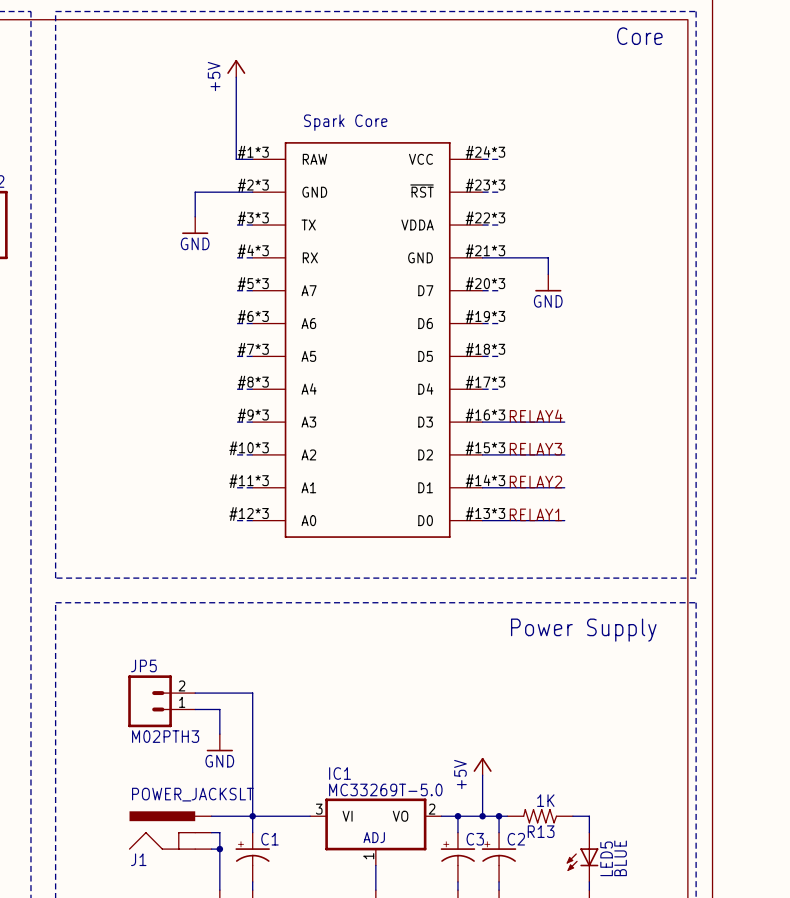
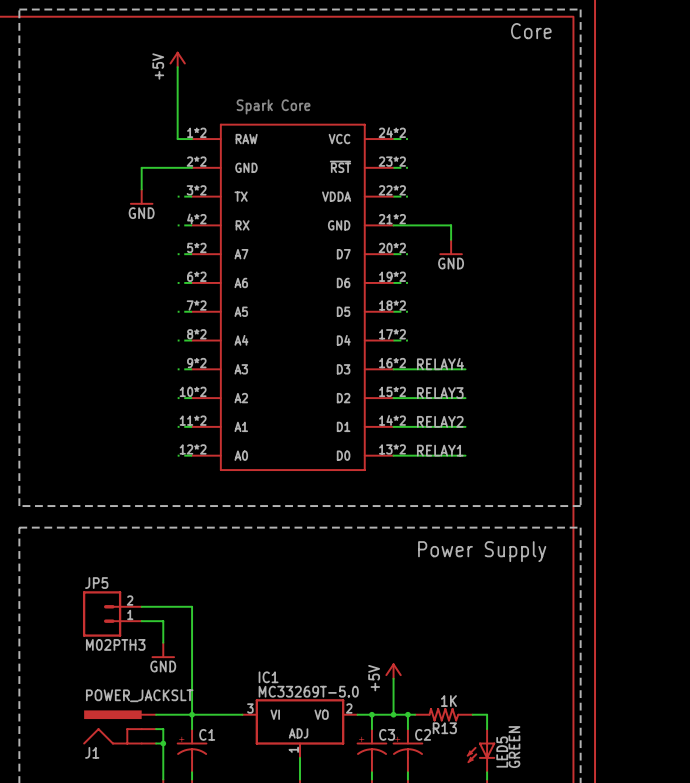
part symbol: [252, 142, 483, 538] -> [192, 123, 394, 471]
LED5 value: BLUE (620, 858) -> GREEN (514, 747)

